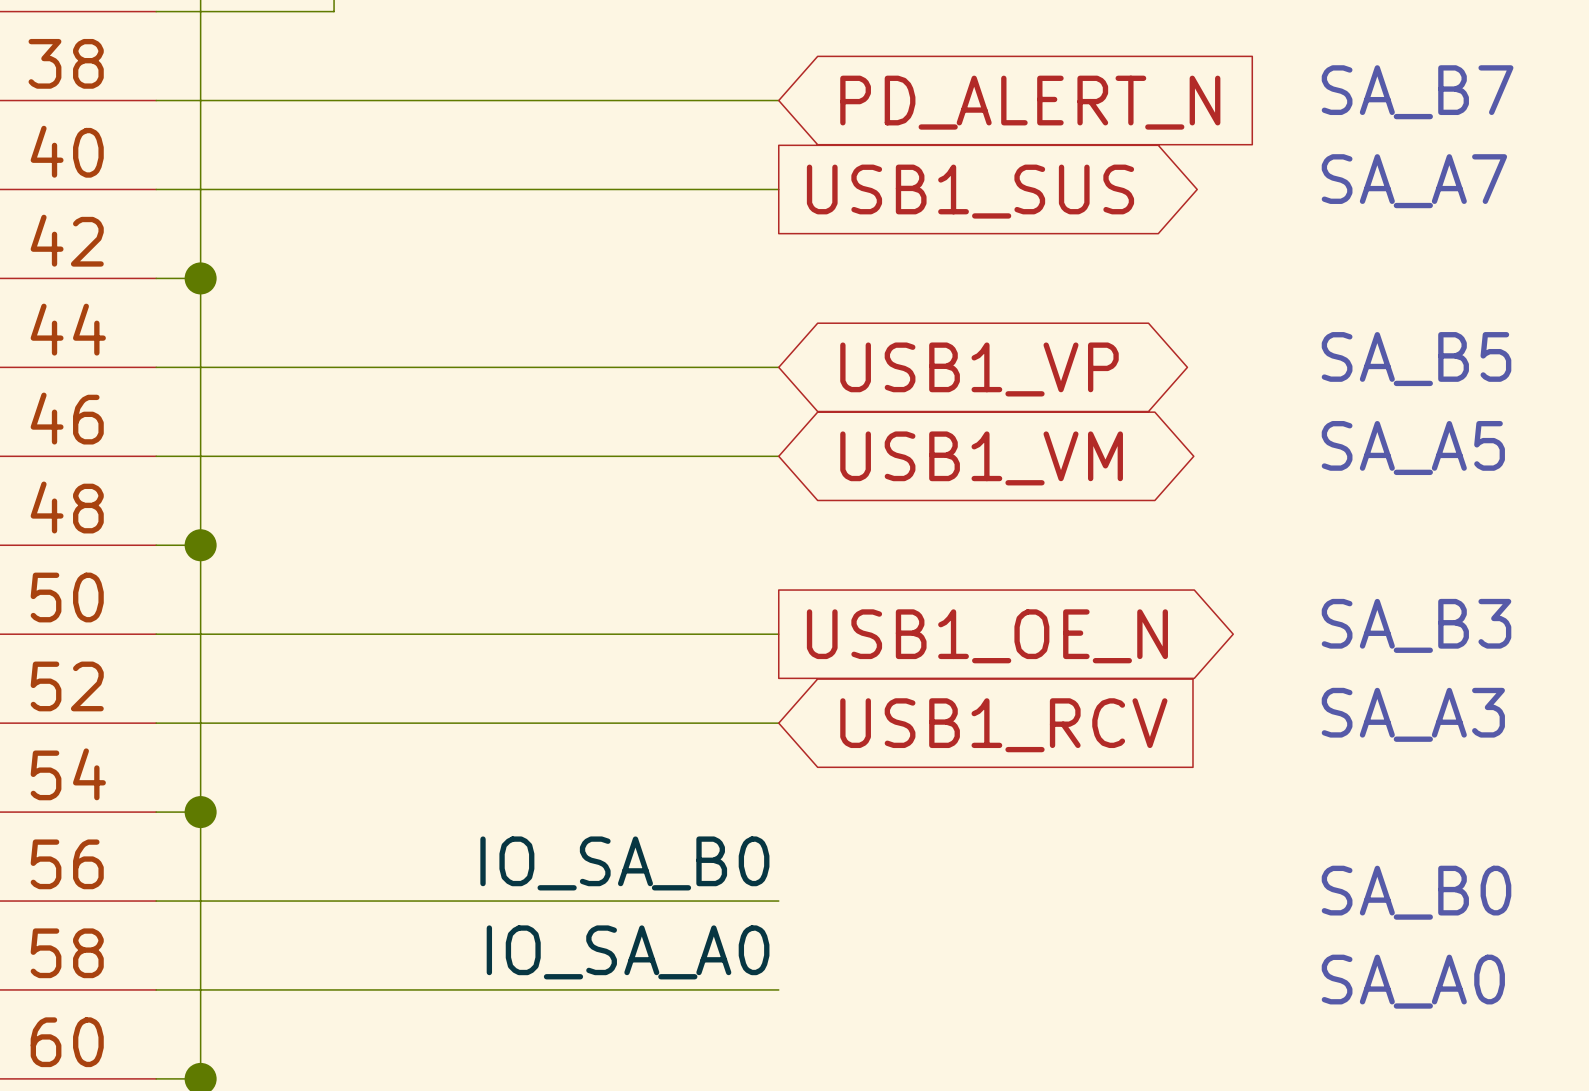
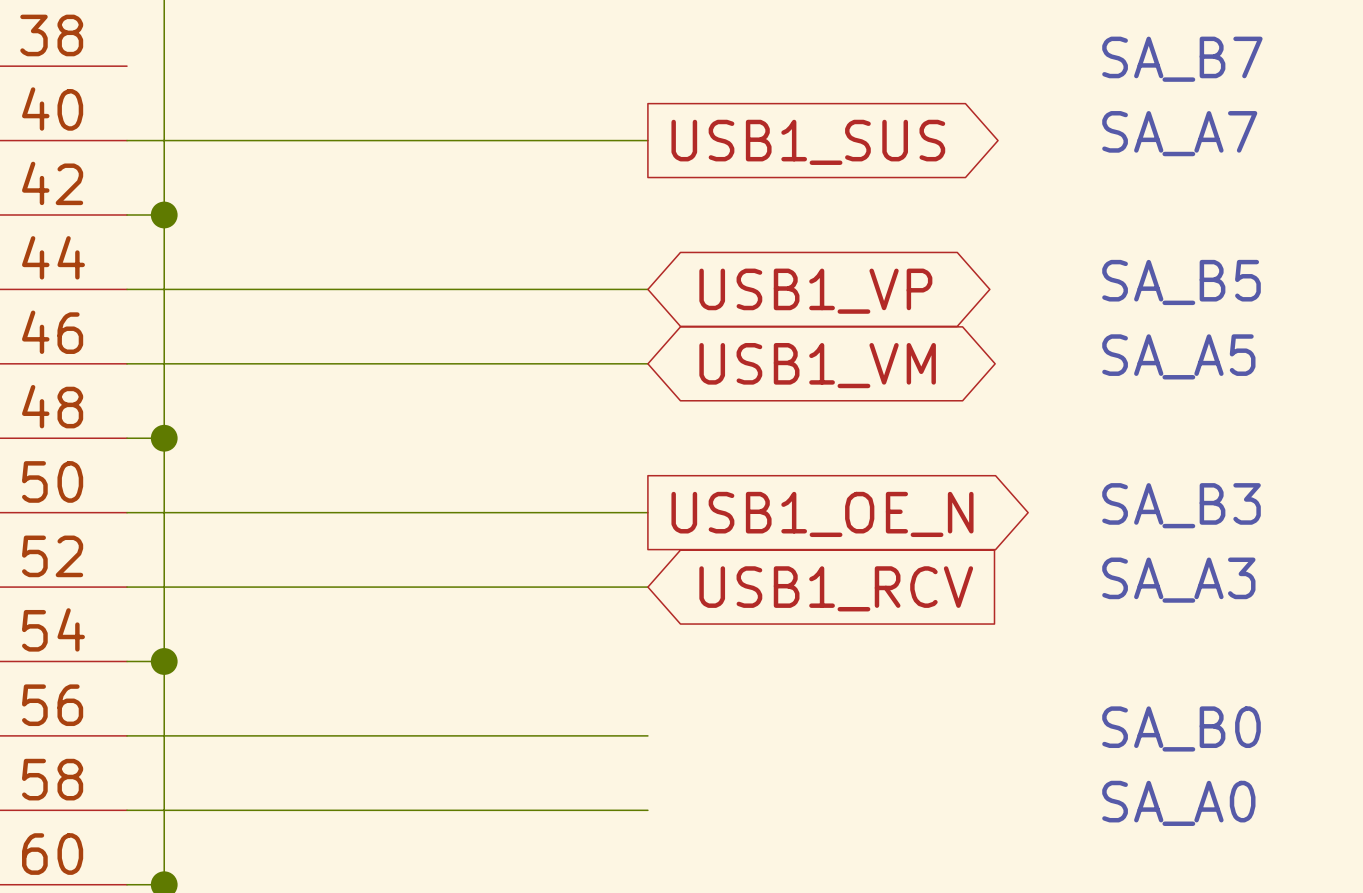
wire: (156, 100) (778, 100) -> none
global label: PD_ALERT_N (1030, 102) -> none
label: IO_SA_B0 (624, 863) -> none
label: IO_SA_A0 (628, 952) -> none

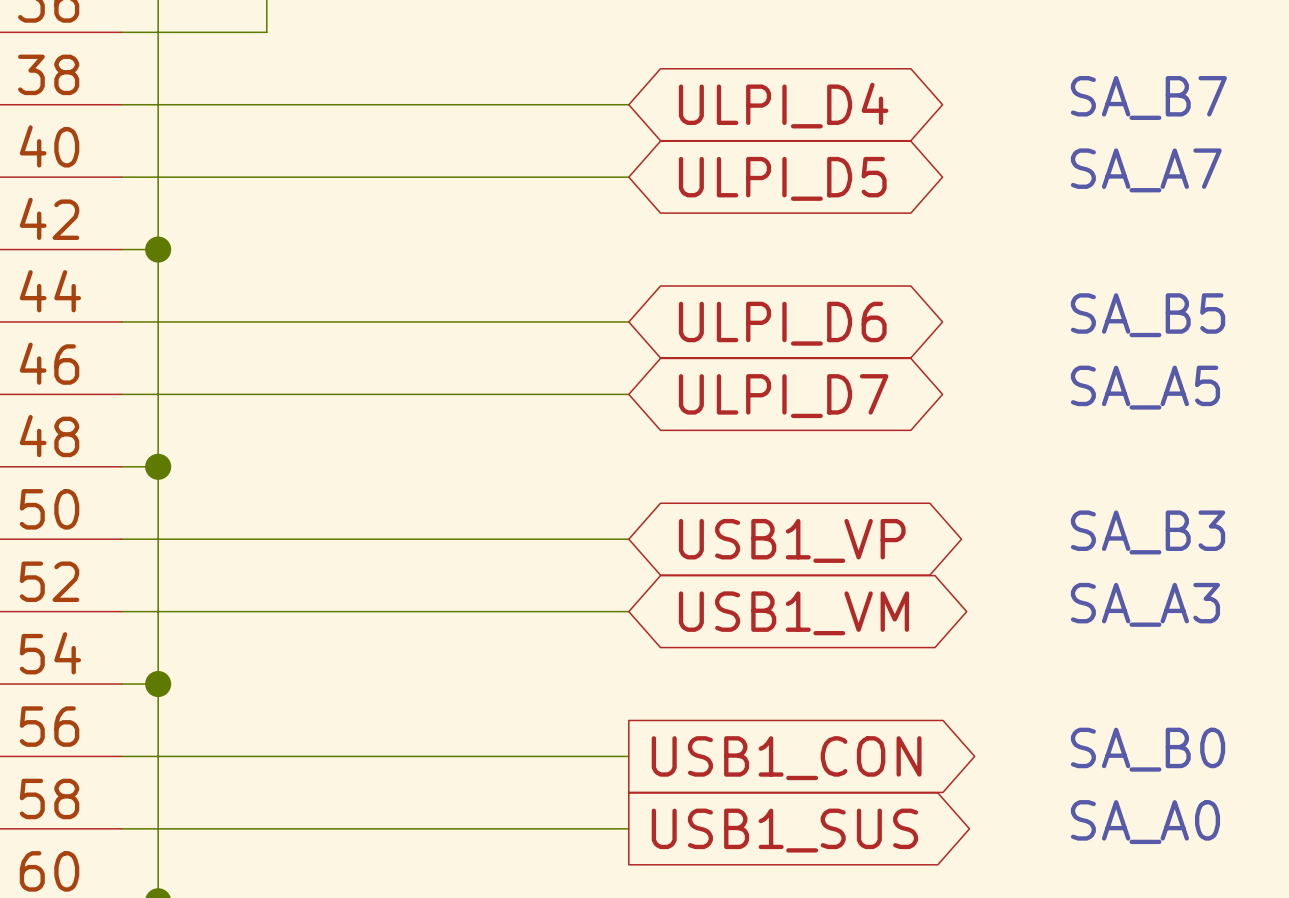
wire: none -> (121, 104) (628, 104)
global label: none -> ULPI_D4 (783, 105)
global label shape: output (808, 142) -> bidirectional (782, 178)
global label: USB1_SUS (808, 142) -> ULPI_D5 (782, 178)
global label: USB1_VP (815, 291) -> ULPI_D6 (782, 323)
global label: USB1_VM (817, 365) -> ULPI_D7 (783, 396)
global label shape: output (822, 514) -> bidirectional (792, 540)
global label: USB1_OE_N (822, 514) -> USB1_VP (792, 540)
global label shape: input (836, 588) -> bidirectional (793, 613)
global label: USB1_RCV (836, 588) -> USB1_VM (793, 613)
global label: none -> USB1_CON (786, 758)
global label: none -> USB1_SUS (784, 830)

